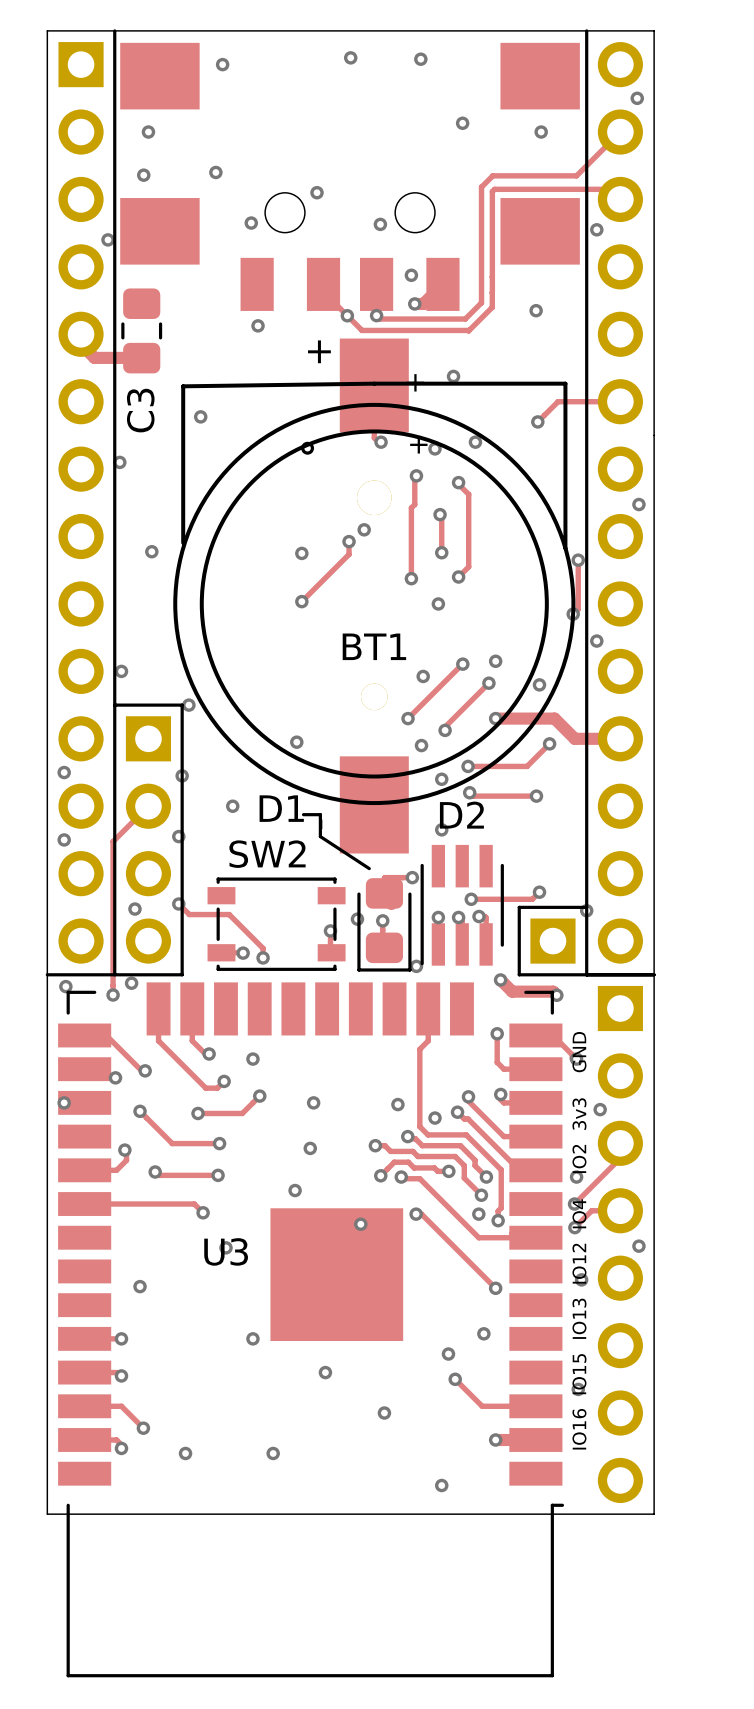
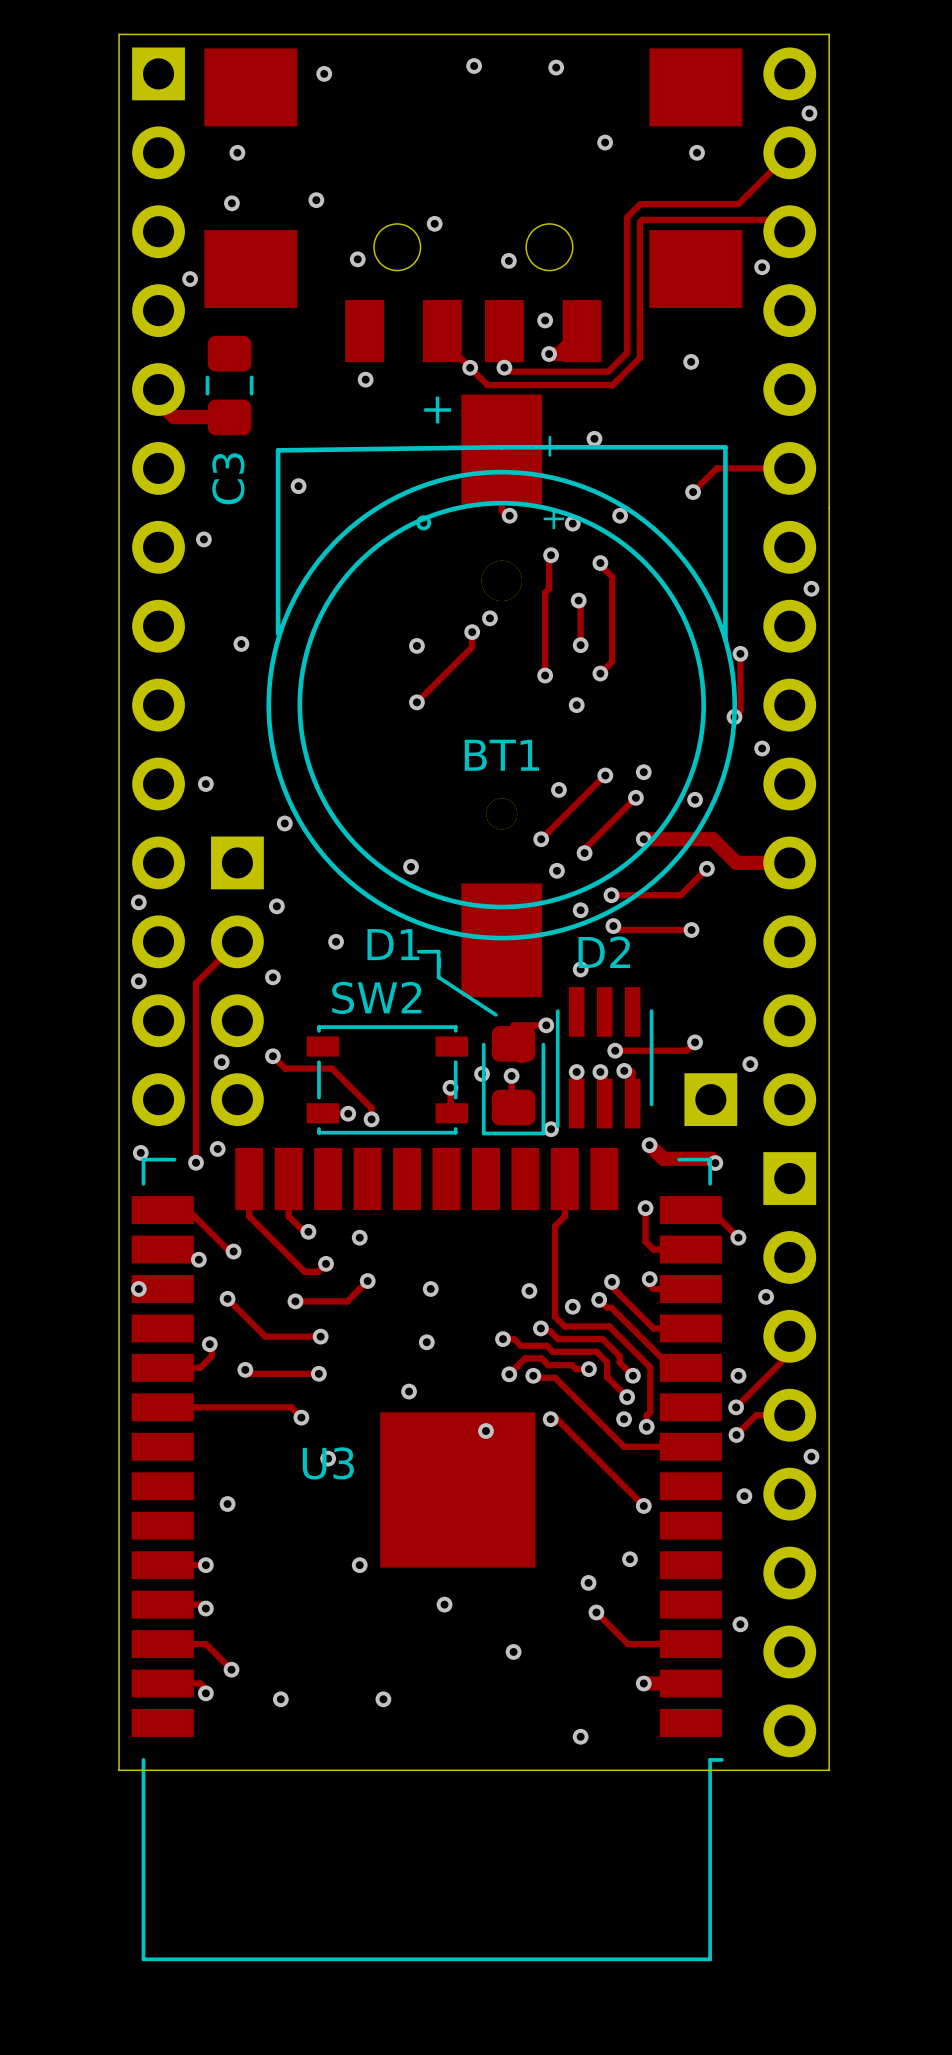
line: (114, 30) (114, 974) -> none
line: (586, 30) (586, 974) -> none
line: (114, 705) (182, 705) (182, 974) (47, 974) -> none
line: (586, 907) (519, 907) (519, 974) (654, 974) -> none
text: IO16 IO15 IO13 IO12 IO4 IO2 3v3 GND (579, 1240) -> none

